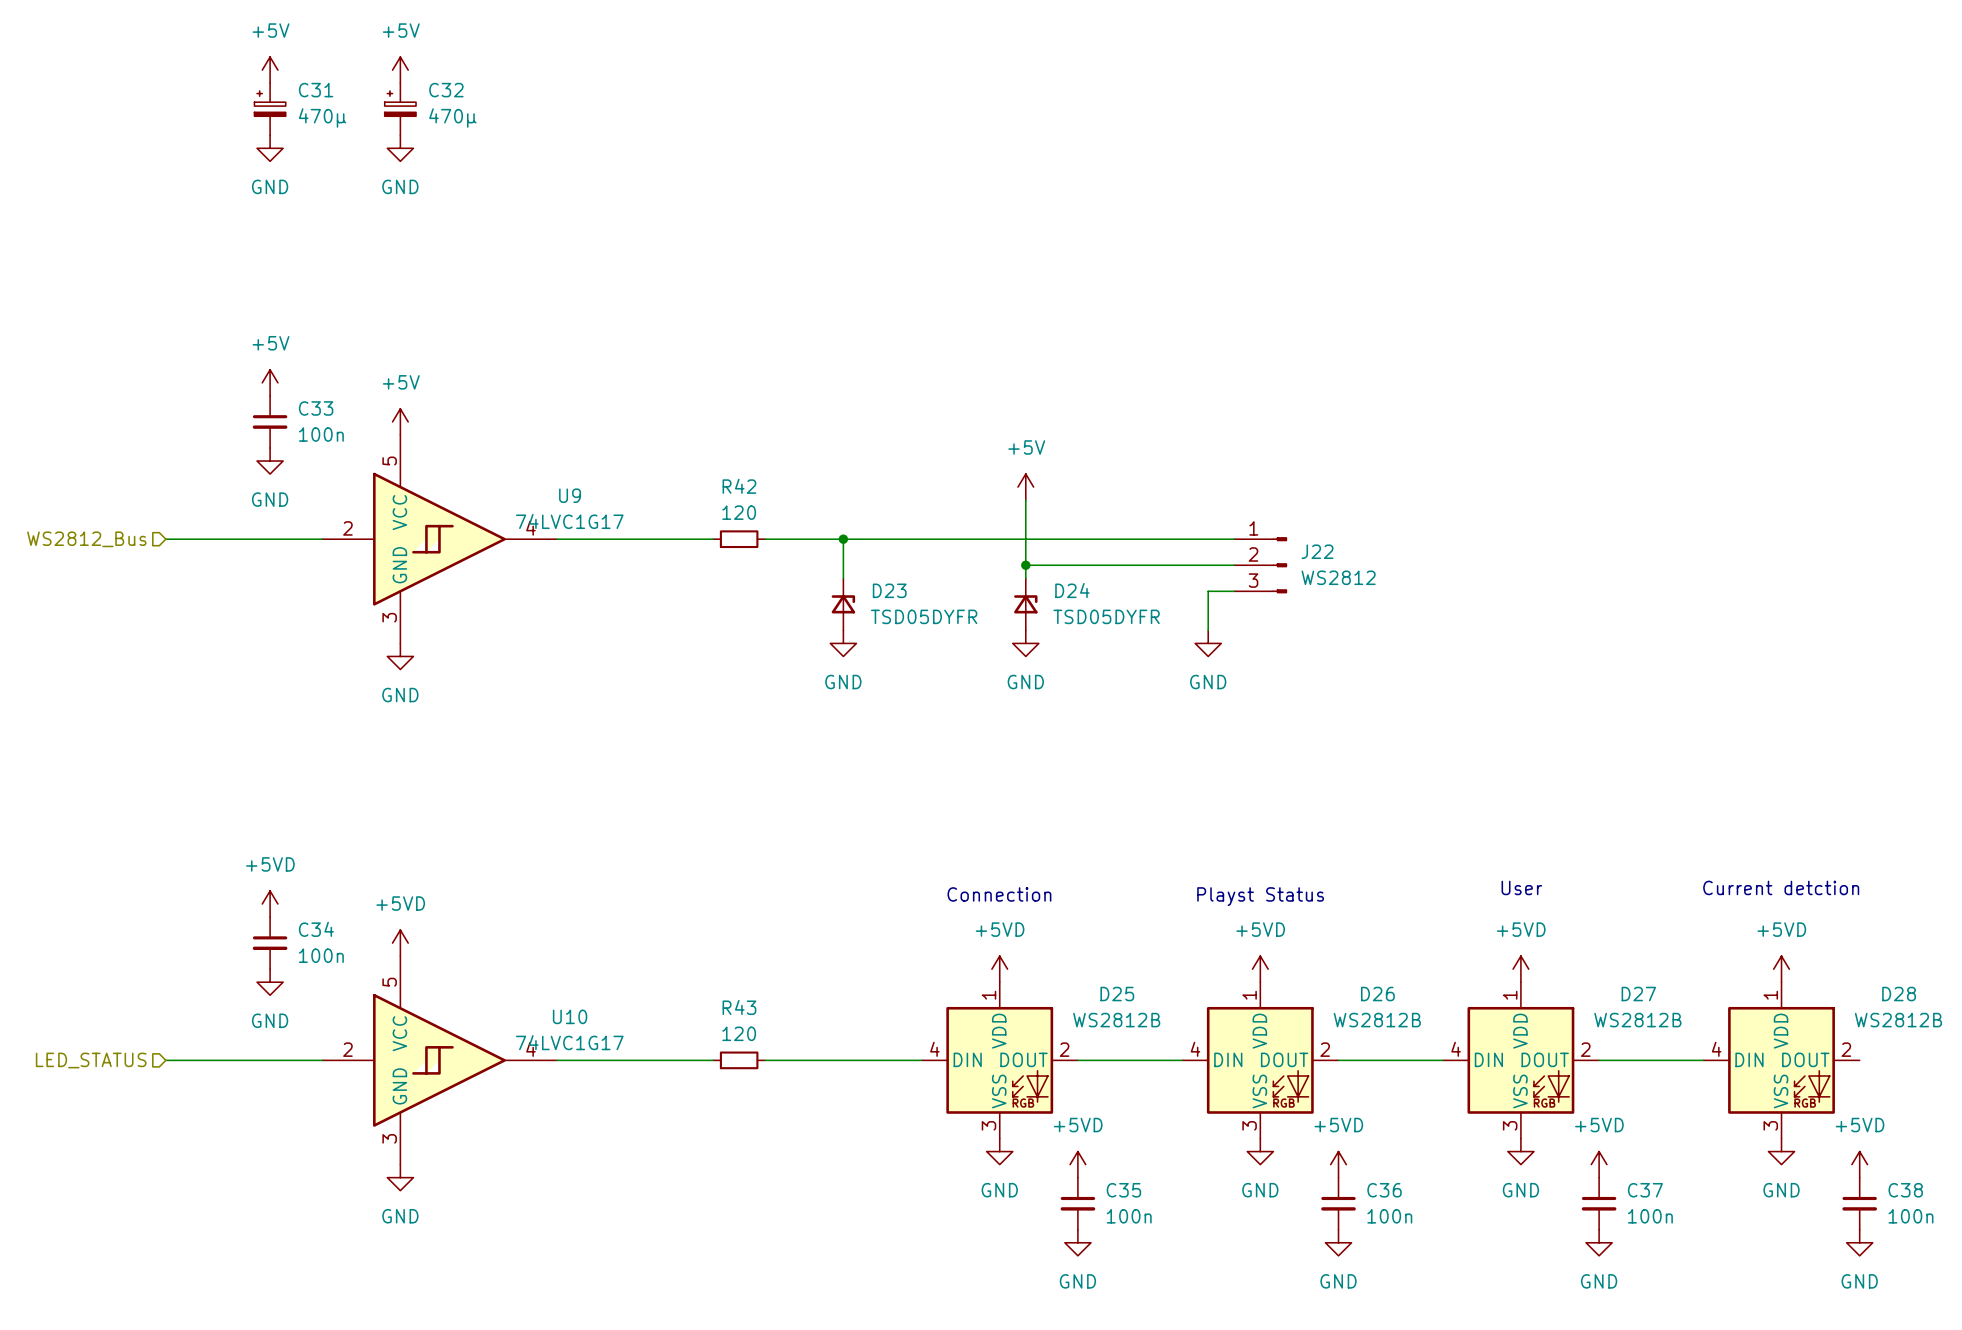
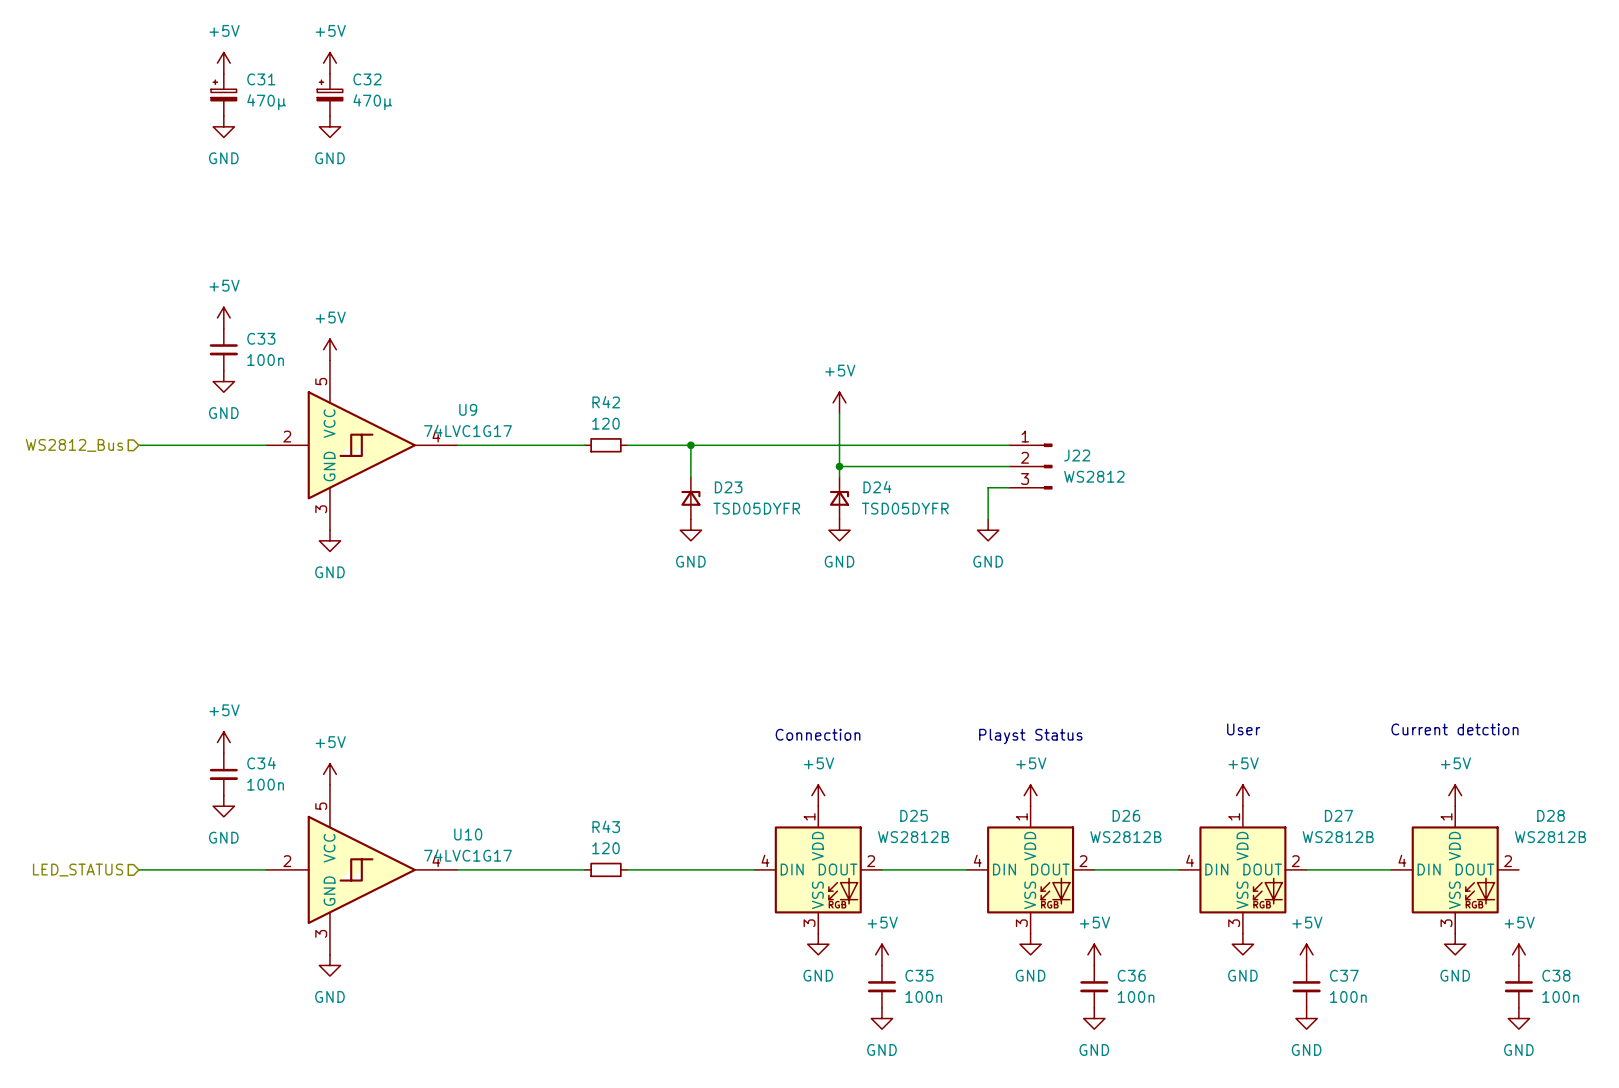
power symbol: +5VD (270, 904) -> +5V (223, 742)
power symbol: +5VD (400, 943) -> +5V (329, 774)
power symbol: +5VD (999, 969) -> +5V (818, 795)
power symbol: +5VD (1260, 969) -> +5V (1030, 795)
power symbol: +5VD (1520, 969) -> +5V (1242, 795)
power symbol: +5VD (1781, 969) -> +5V (1455, 795)
power symbol: +5VD (1077, 1164) -> +5V (881, 954)
power symbol: +5VD (1338, 1164) -> +5V (1094, 954)
power symbol: +5VD (1599, 1164) -> +5V (1306, 954)
power symbol: +5VD (1859, 1164) -> +5V (1518, 954)

